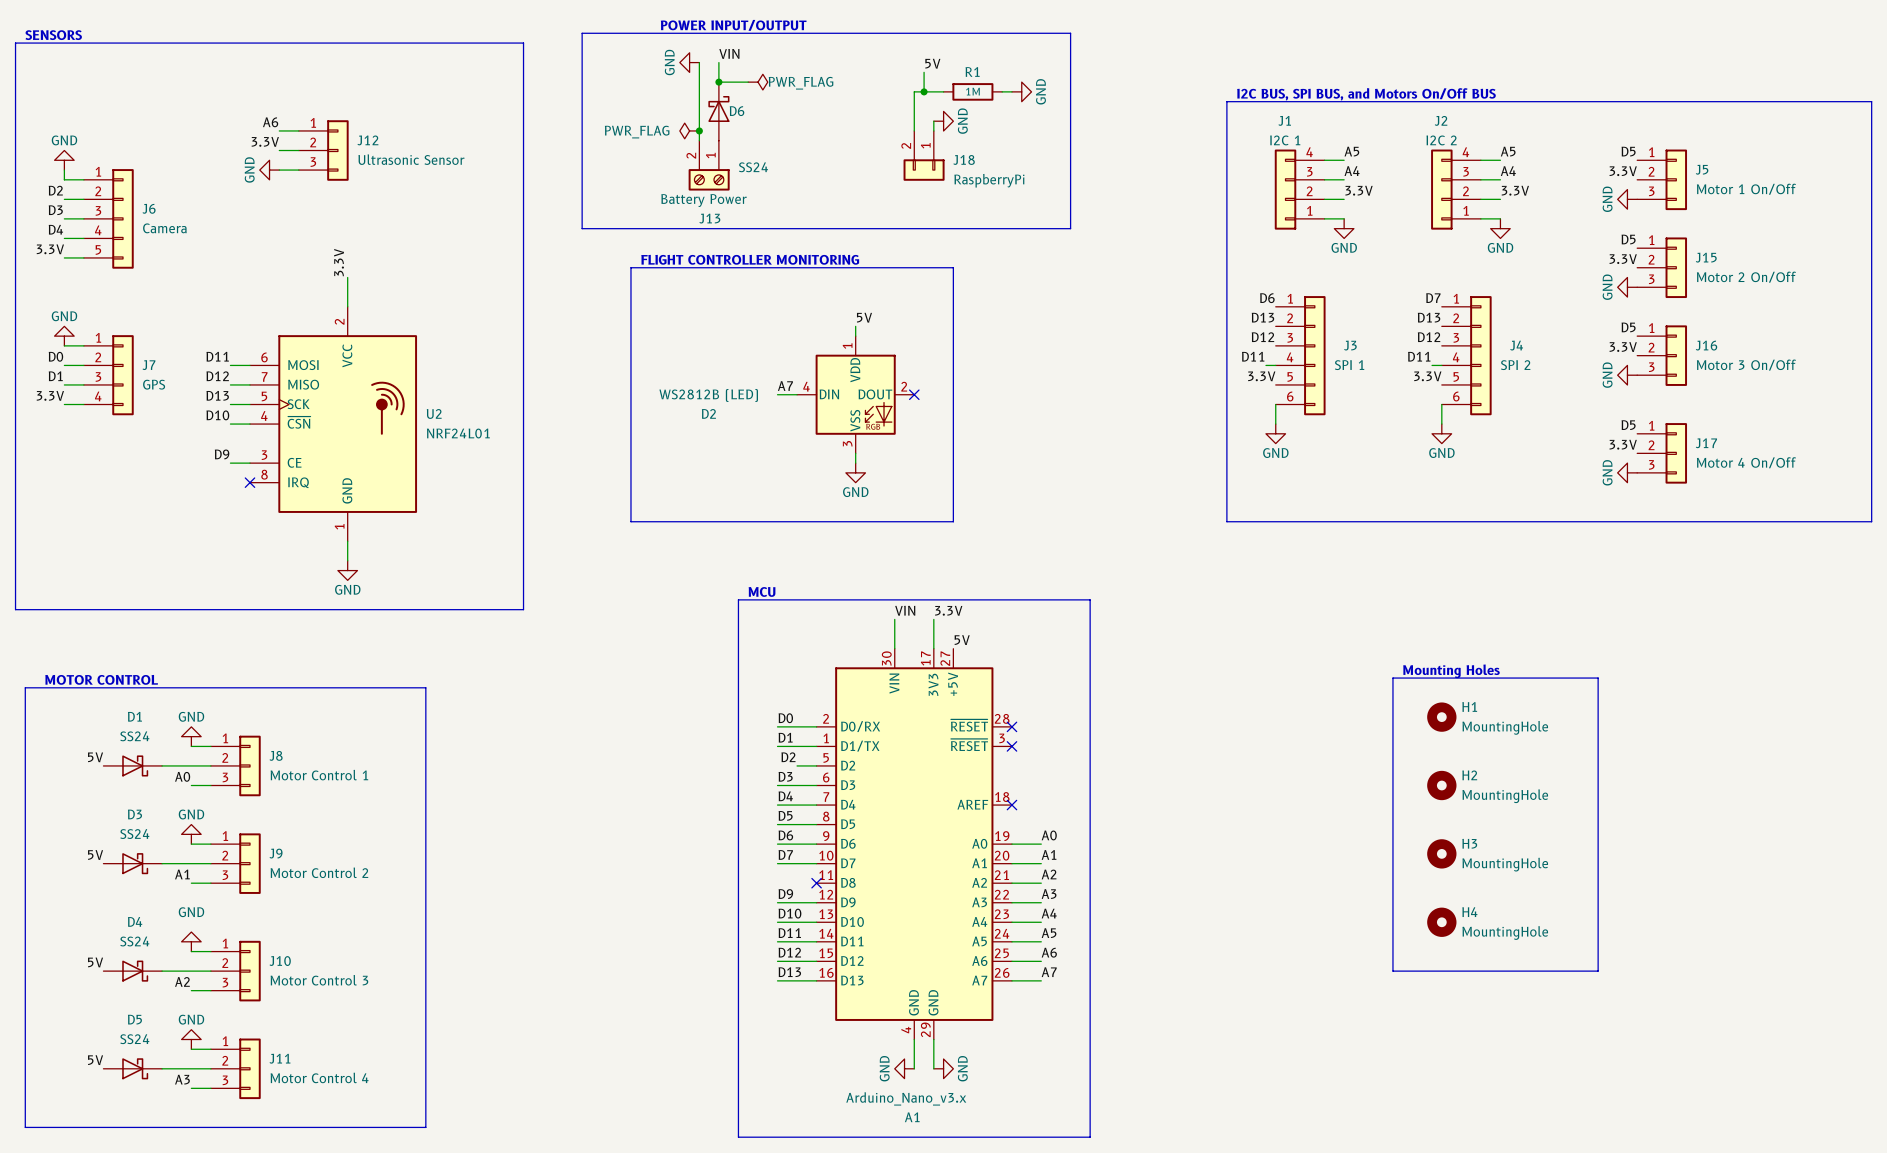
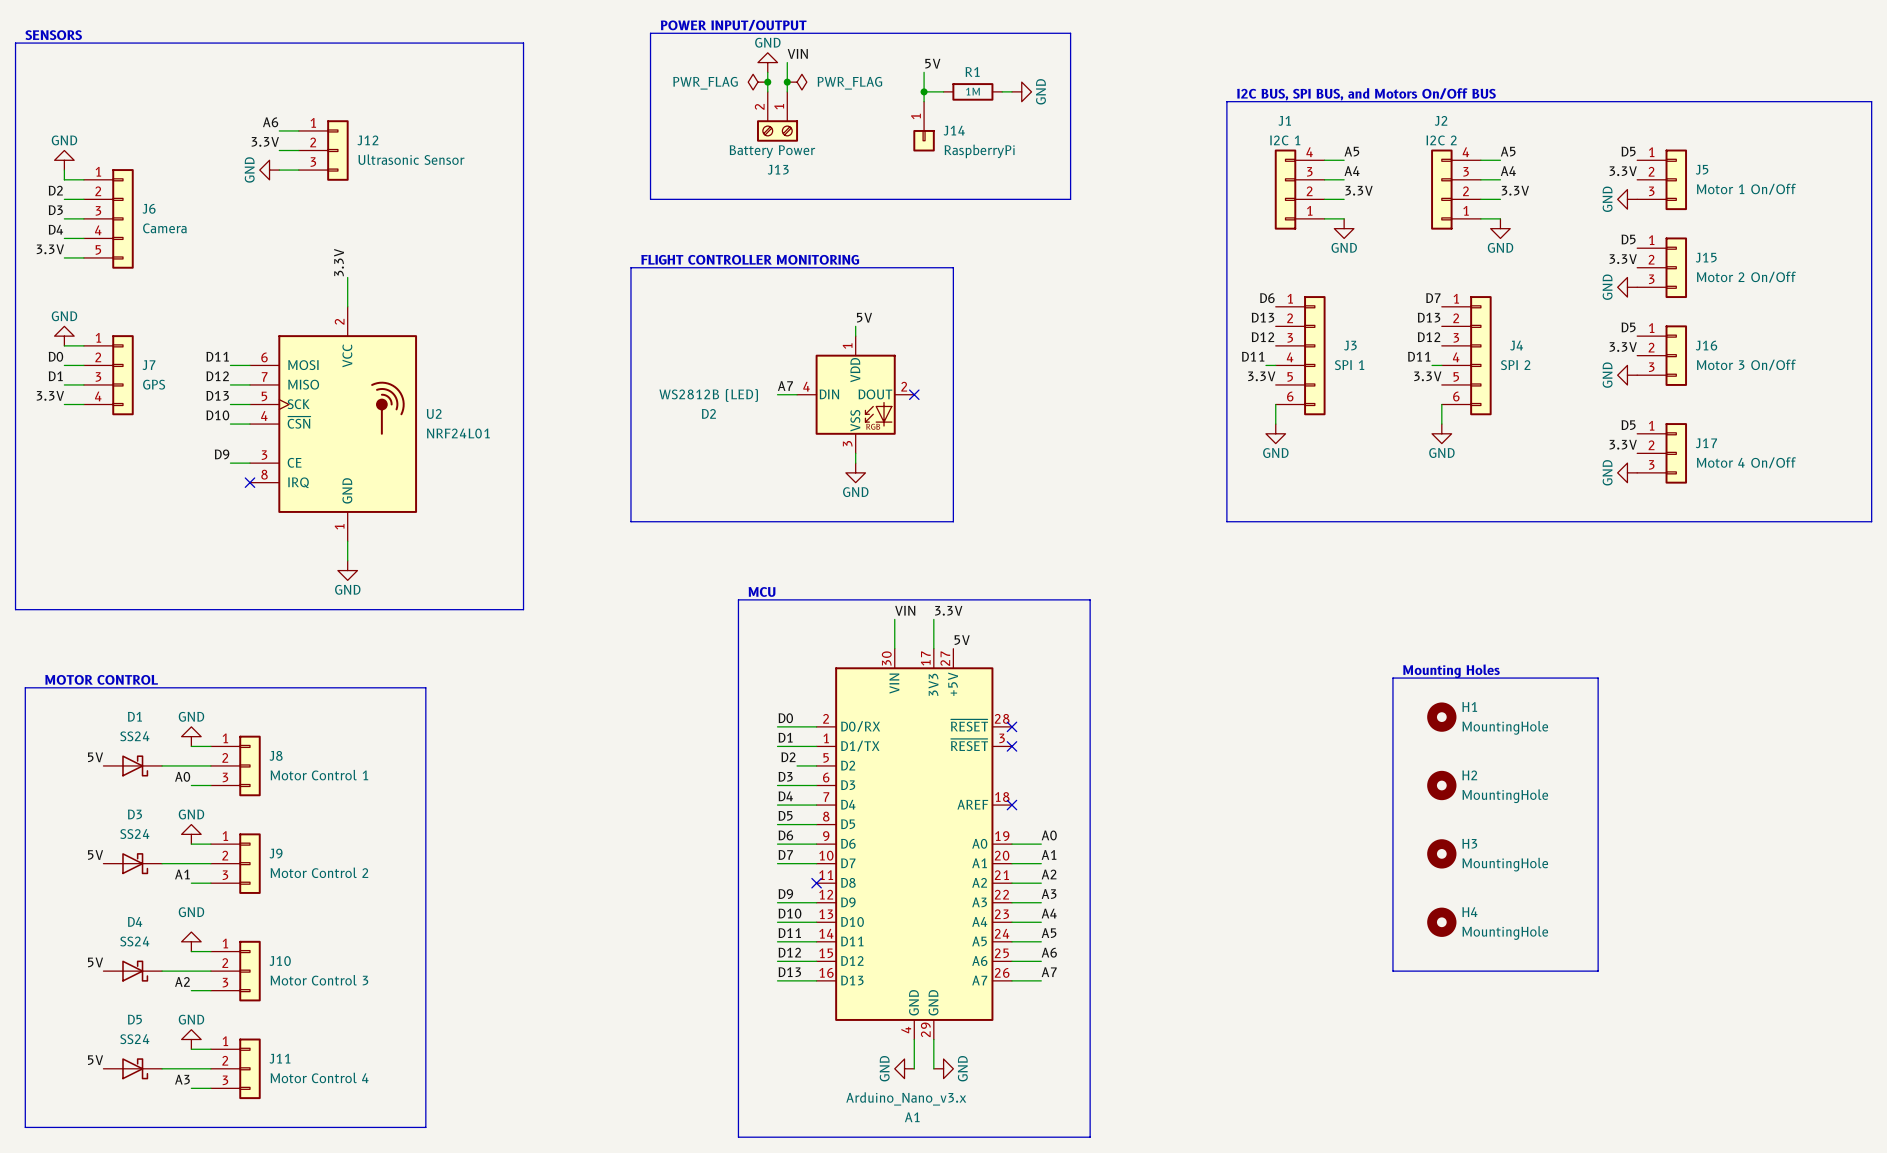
line: (650, 33) (582, 33) (582, 228) (1070, 228) (1070, 199) -> (650, 33) (650, 199) (1070, 199)
label position: VIN (729, 53) -> VIN (797, 53)
power symbol rotation: 0° (689, 62) -> 90° clockwise (767, 62)
power symbol position: GND (689, 62) -> GND (767, 62)
wire: (699, 62) (699, 140) -> none
wire: (718, 62) (718, 82) (748, 82) -> none
wire: none -> (787, 62) (787, 91)
wire: none -> (767, 72) (767, 91)
junction: (718, 82) -> none
power symbol rotation: 0° (757, 82) -> 180° (757, 82)
junction: none -> (767, 82)
junction: none -> (787, 82)
wire: (924, 91) (914, 91) (914, 130) -> (924, 91) (924, 101)
D6: SS24 (718, 111) -> none
wire: (933, 121) (933, 130) -> none
power symbol: GND (943, 121) -> none
J14: none -> RaspberryPi (924, 126)
power symbol rotation: 0° (689, 130) -> 180° (797, 82)
power symbol position: PWR_FLAG (689, 130) -> PWR_FLAG (797, 82)
junction: (699, 130) -> none
J18: RaspberryPi (924, 155) -> none
J13 position: (709, 165) -> (777, 116)

